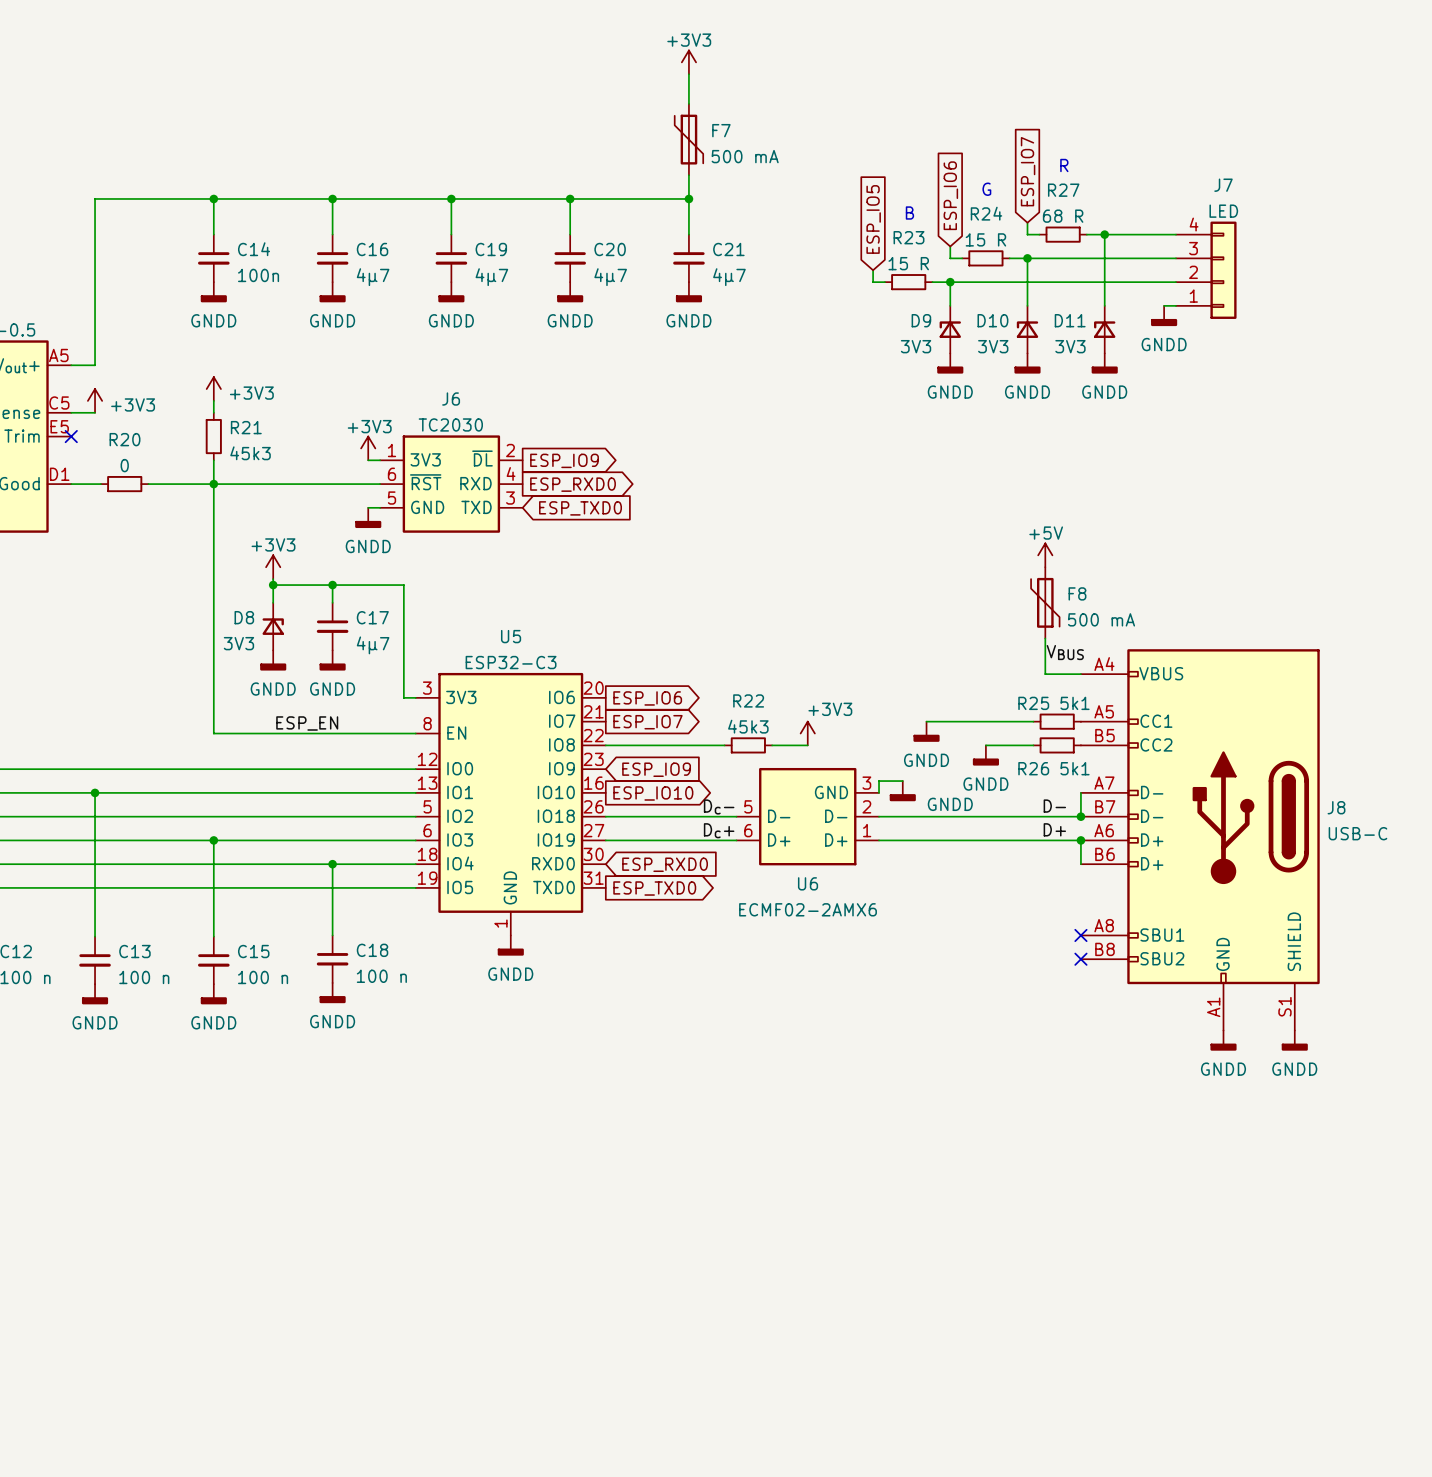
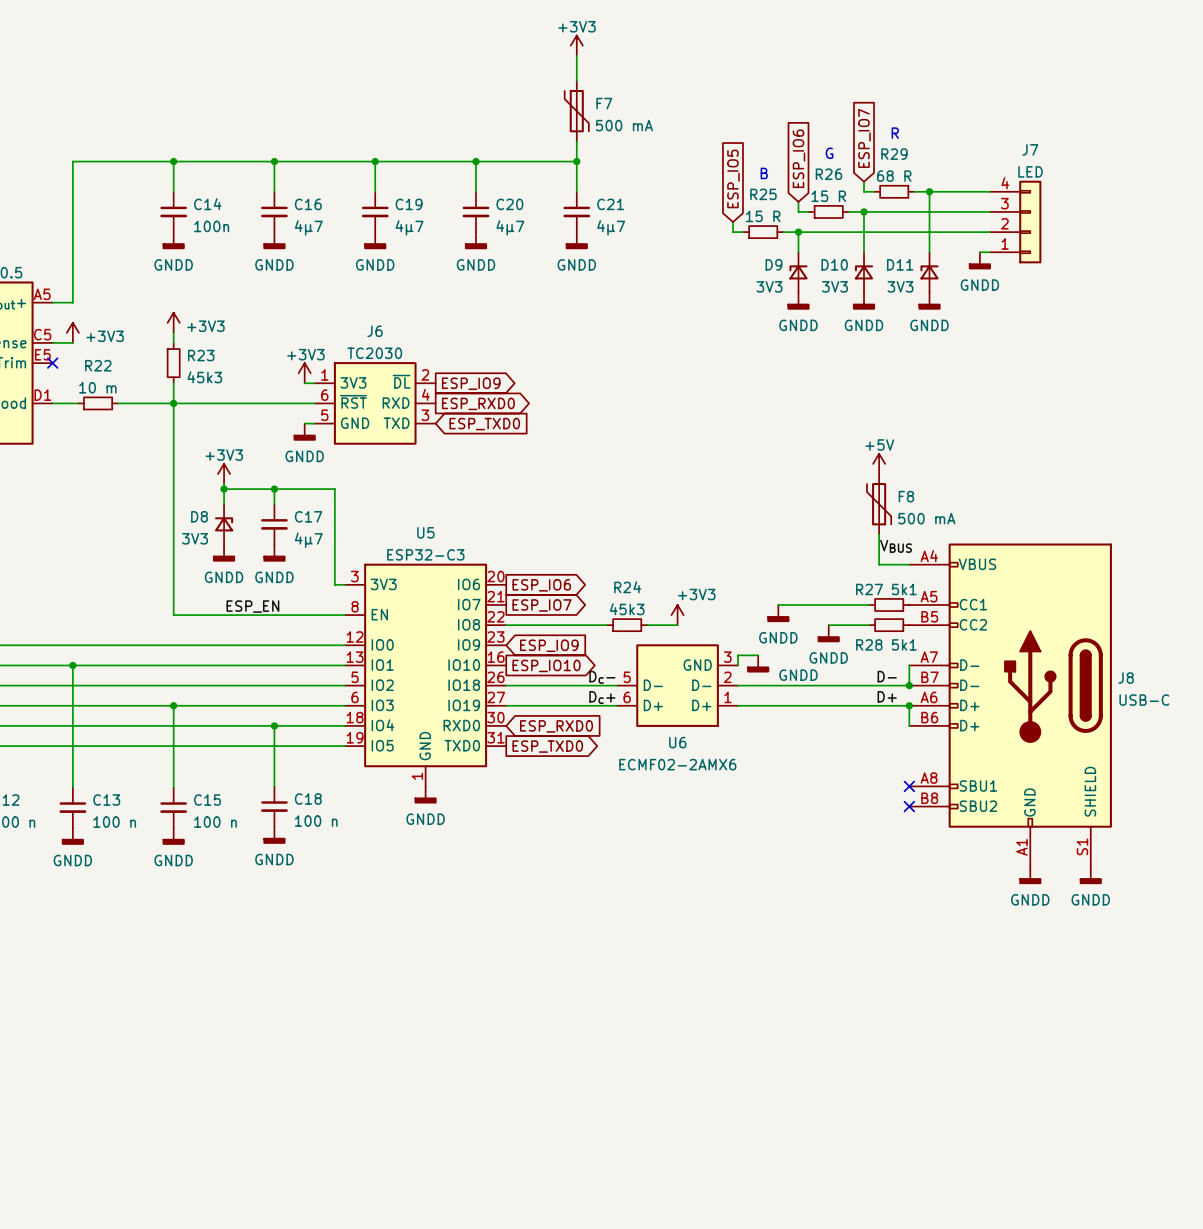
R27 name: R27 (1063, 190) -> R29 (894, 154)
R24 name: R24 (986, 213) -> R26 (828, 174)
R23 name: R23 (908, 237) -> R25 (763, 194)
R21 name: R21 (246, 427) -> R23 (201, 355)
R20 name: R20 (125, 439) -> R22 (98, 365)
R20 value: 0 (124, 465) -> 10 m (97, 387)
R22 name: R22 (748, 700) -> R24 (627, 587)
R25 name: R25 (1033, 703) -> R27 (869, 589)
R26 name: R26 (1033, 768) -> R28 (869, 644)

